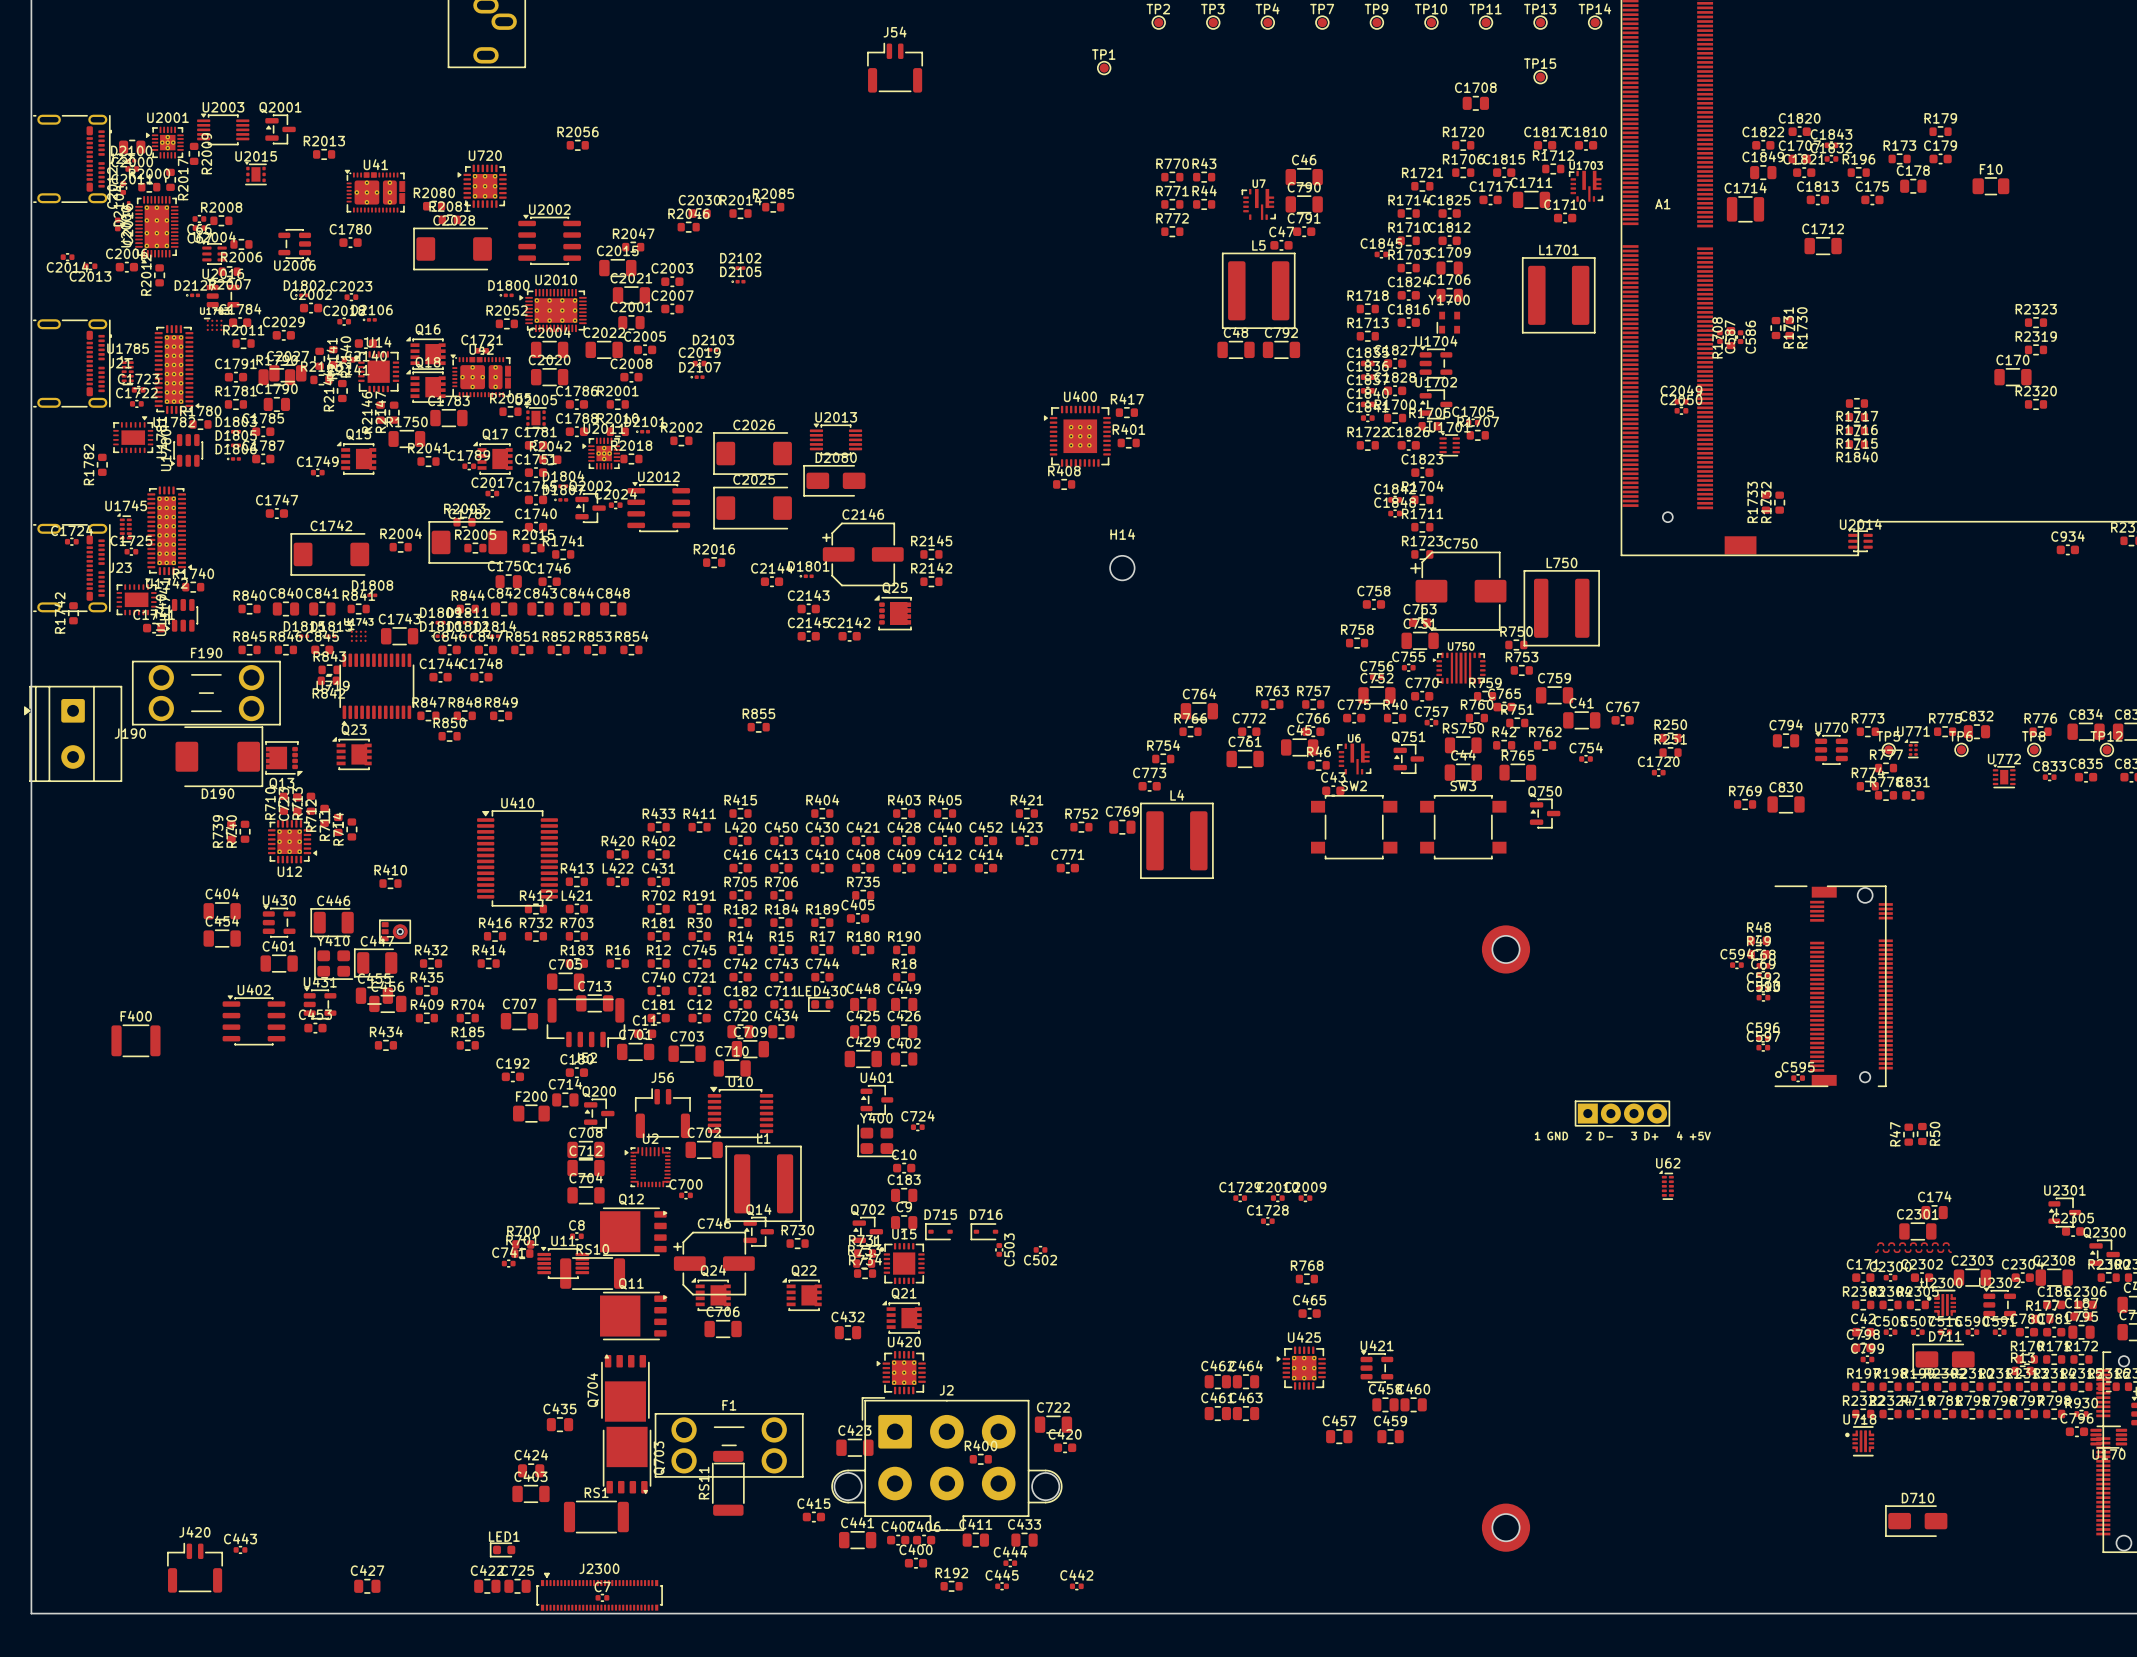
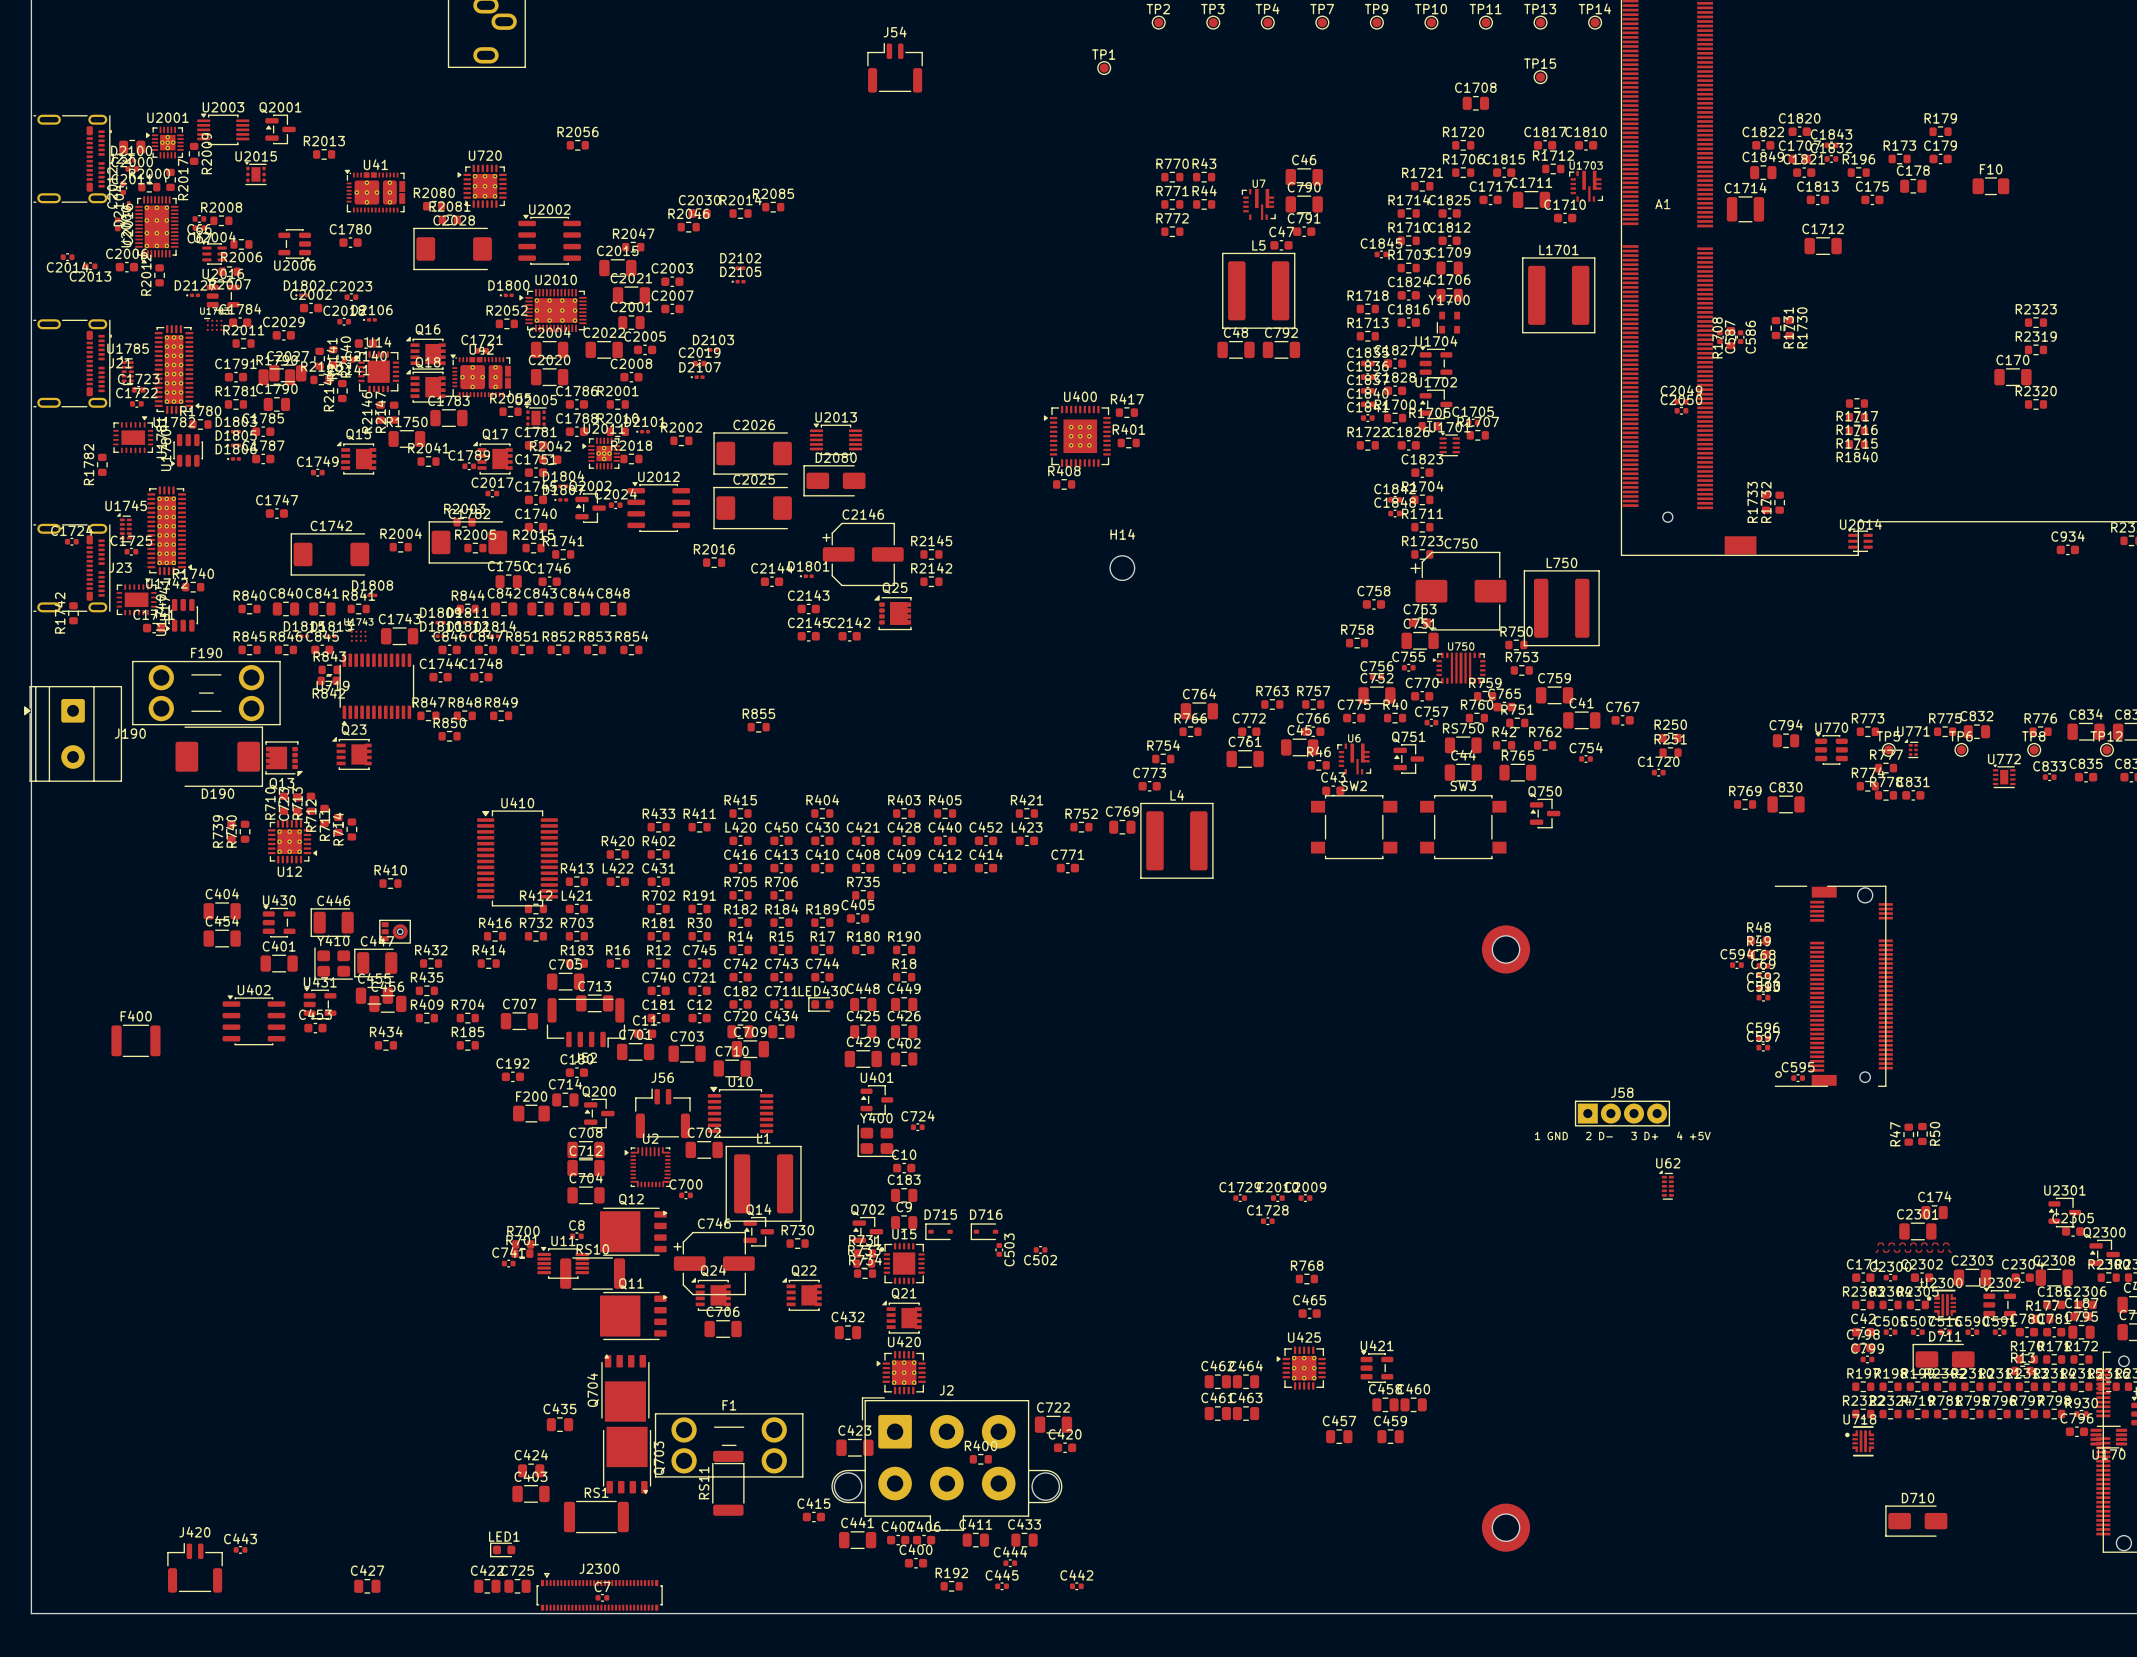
J58 name: none -> J58 (1622, 1092)

